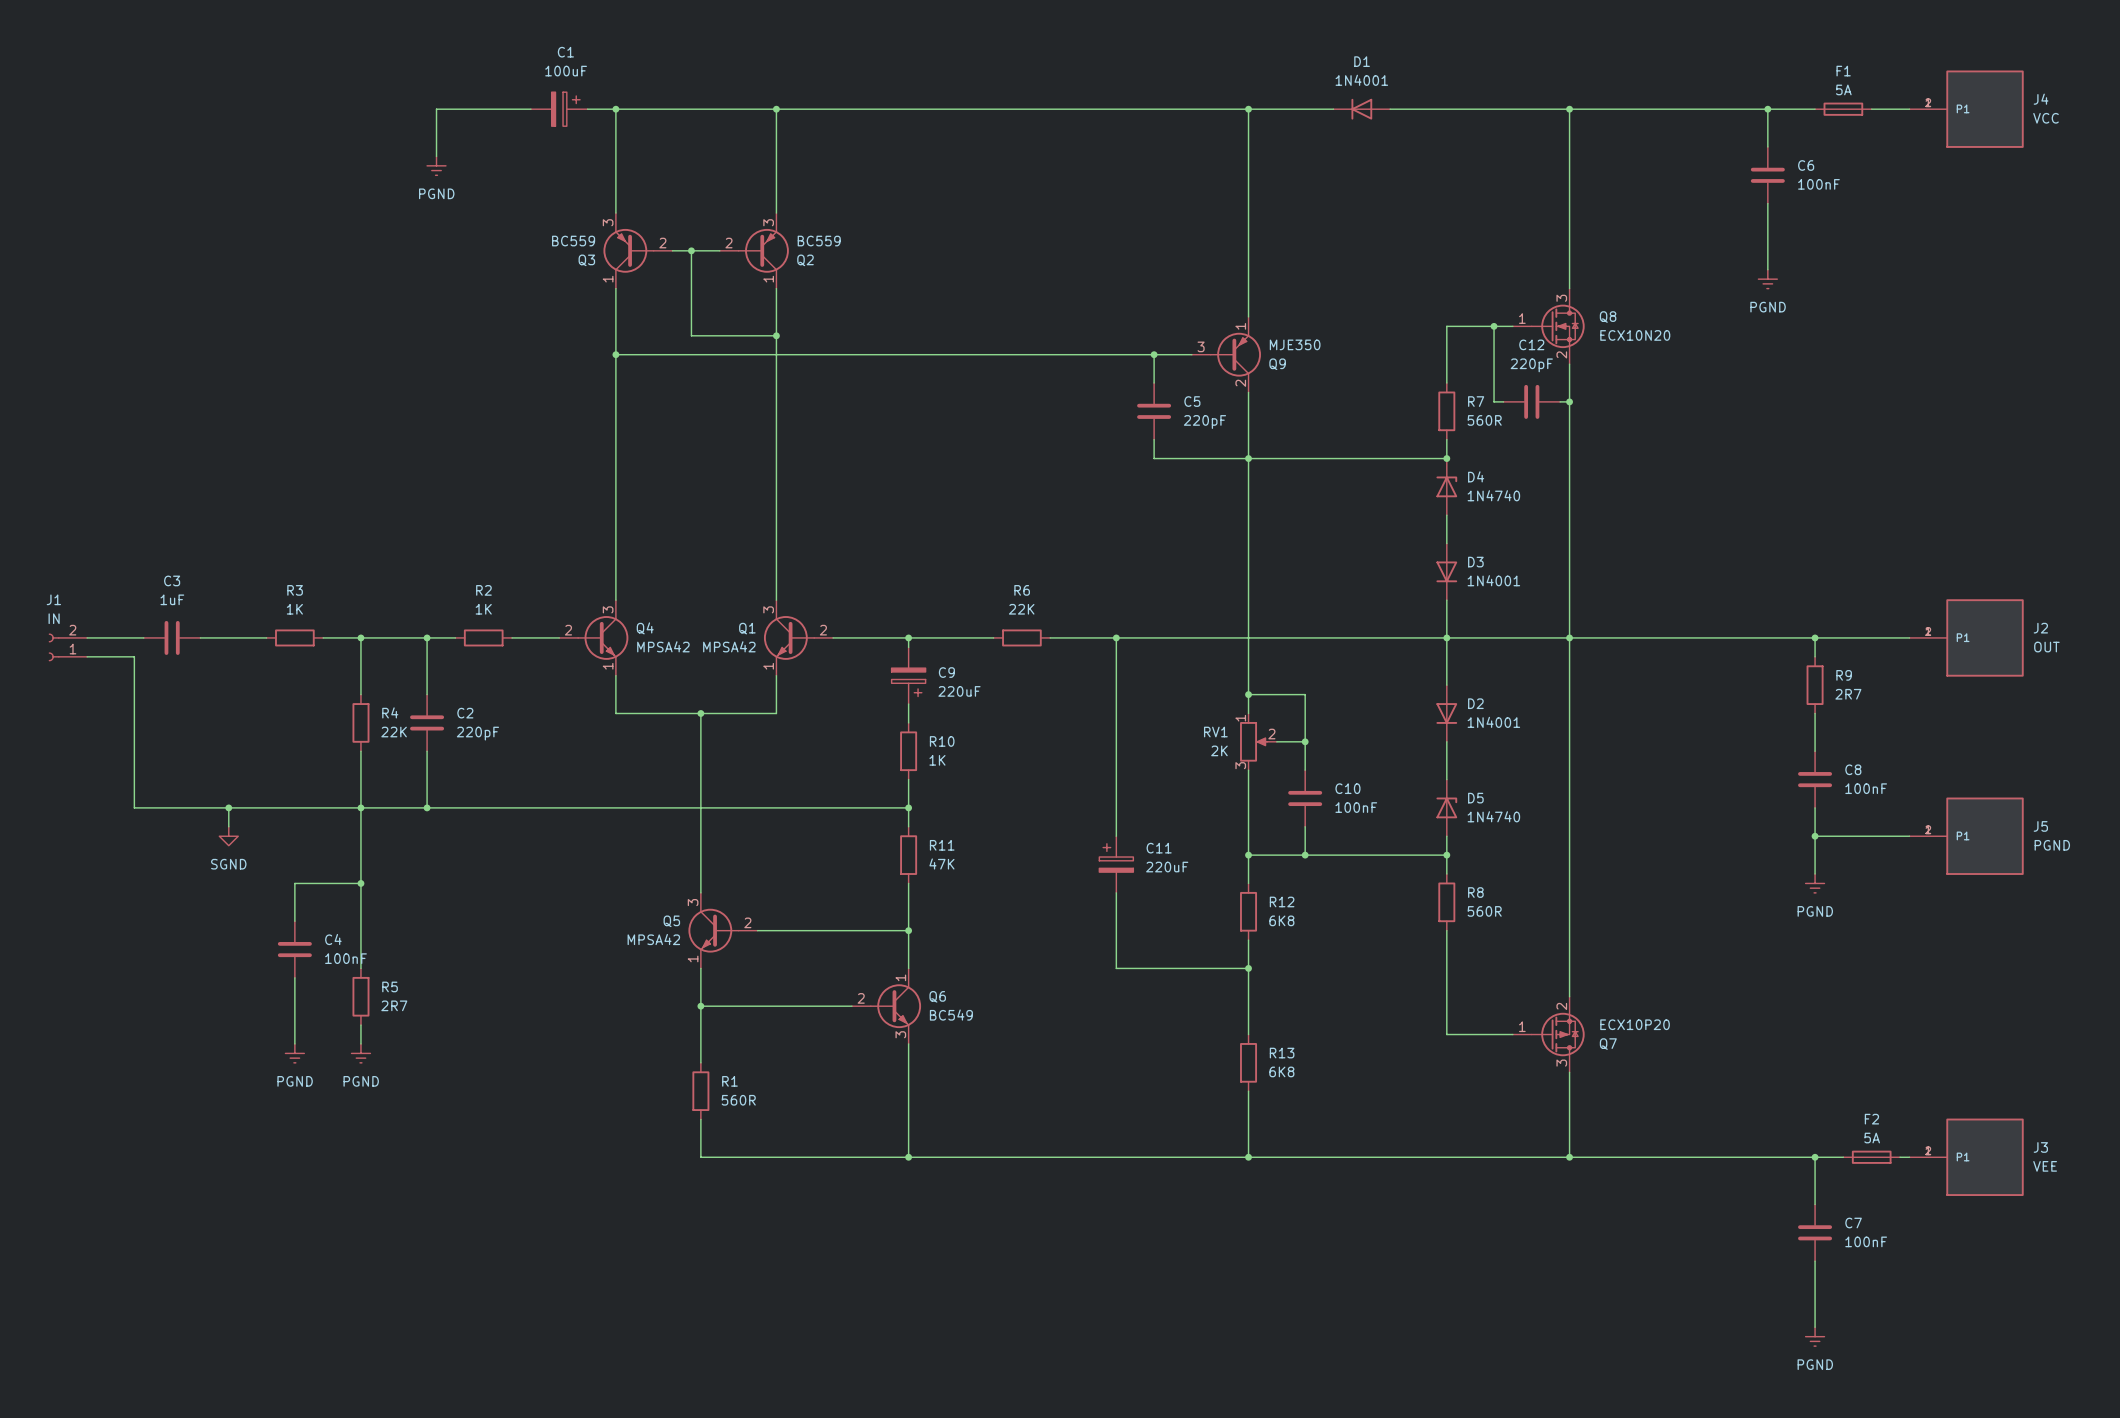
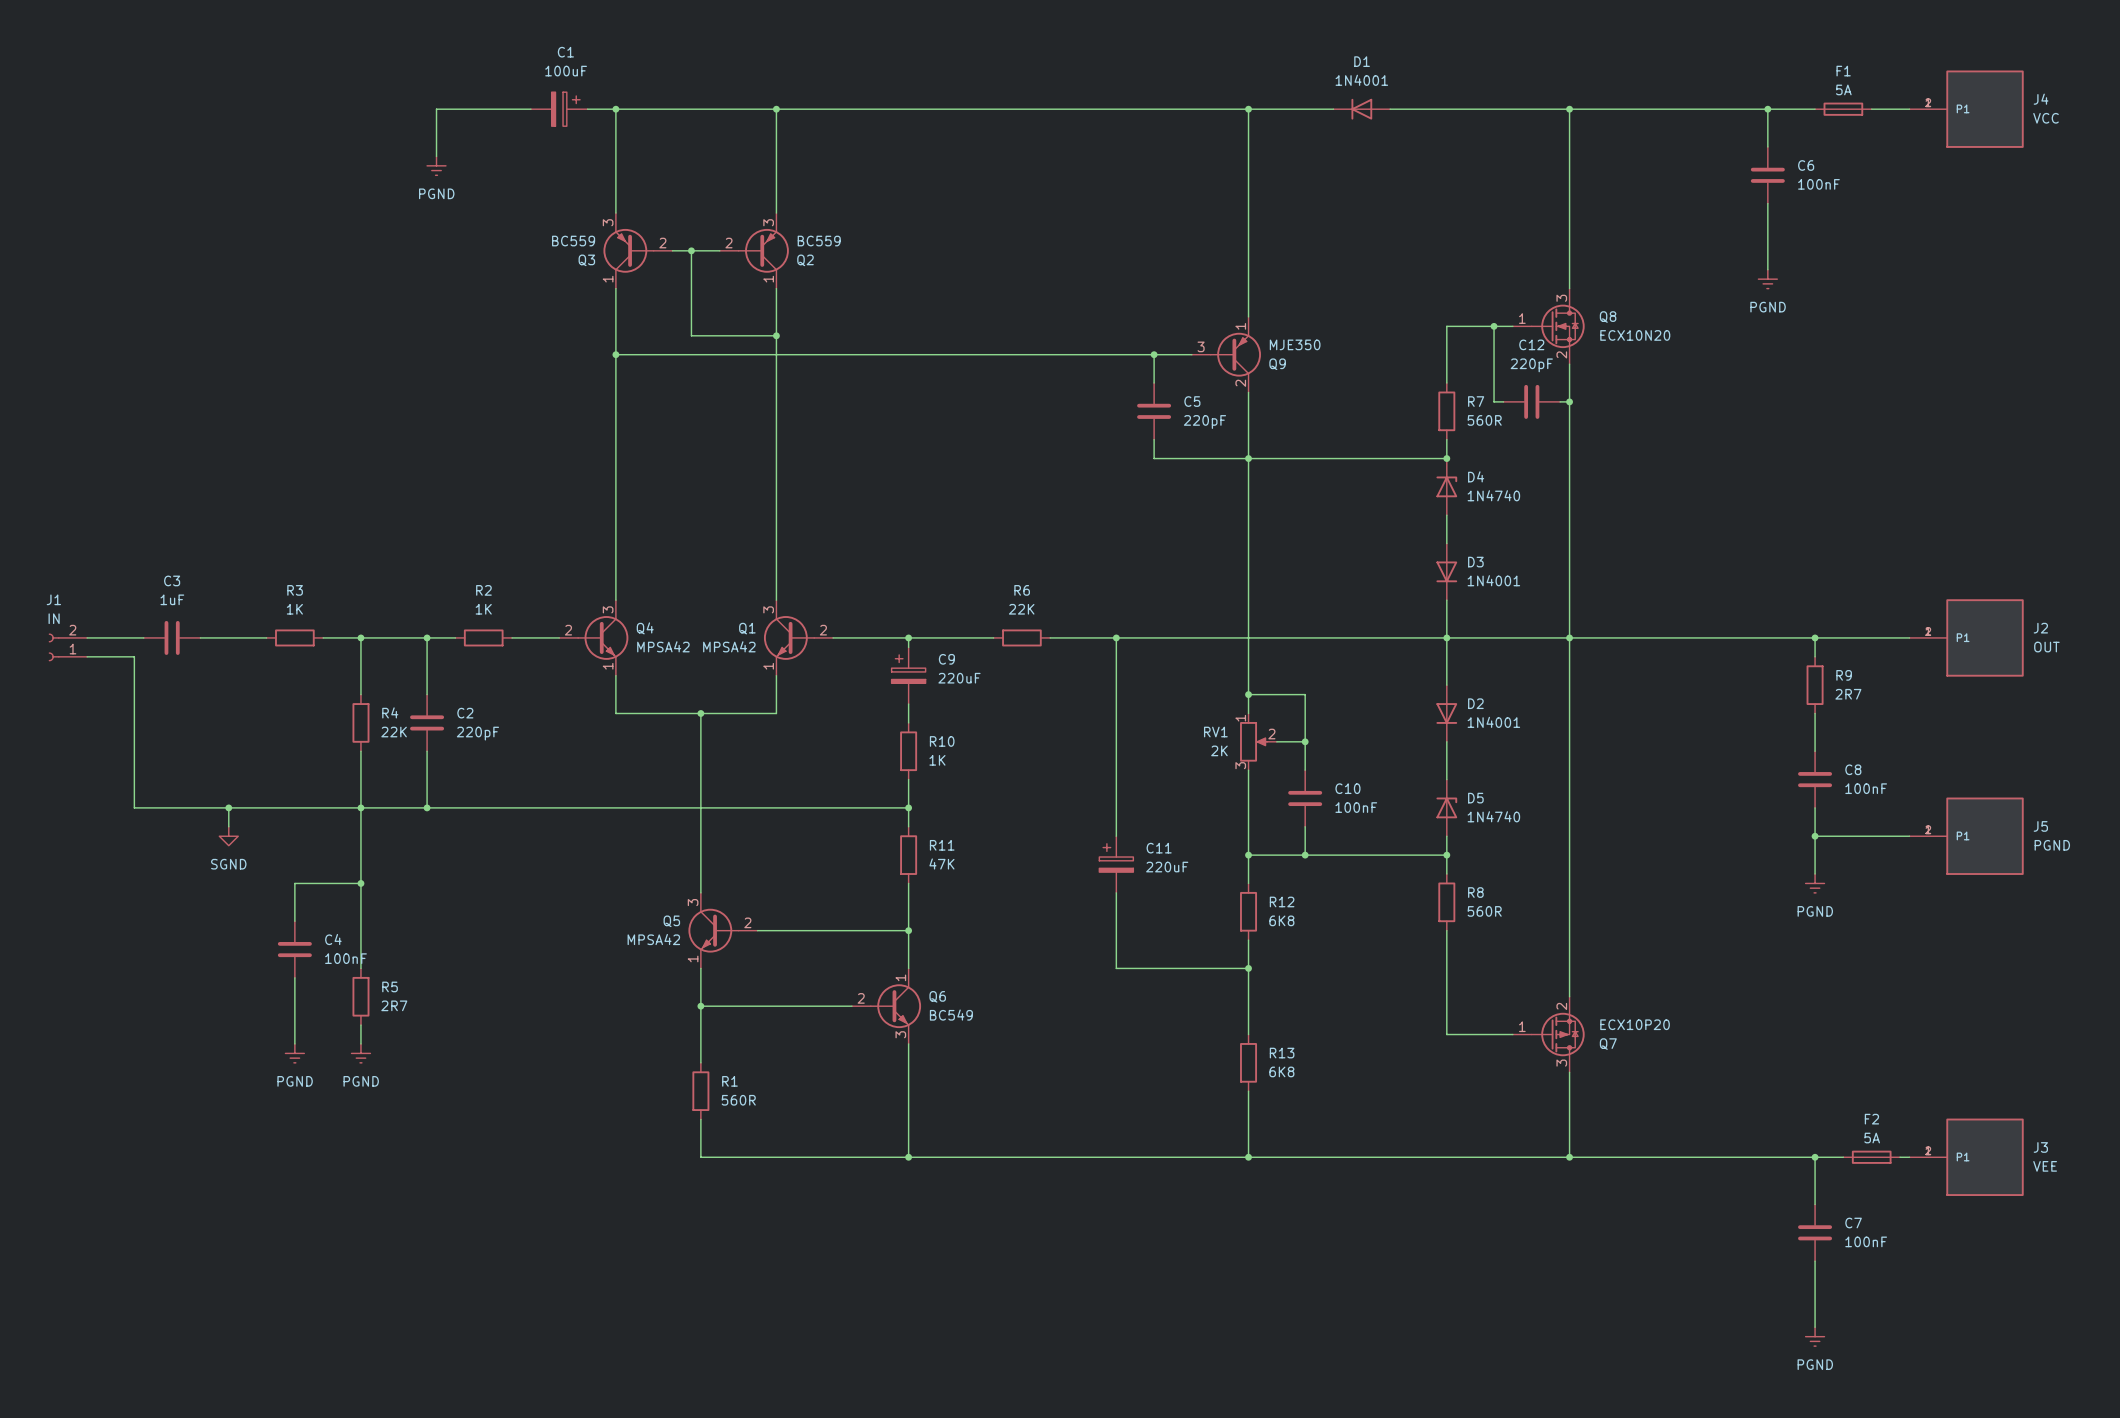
C9 rotation: 0° (908, 682) -> 180° (908, 669)

